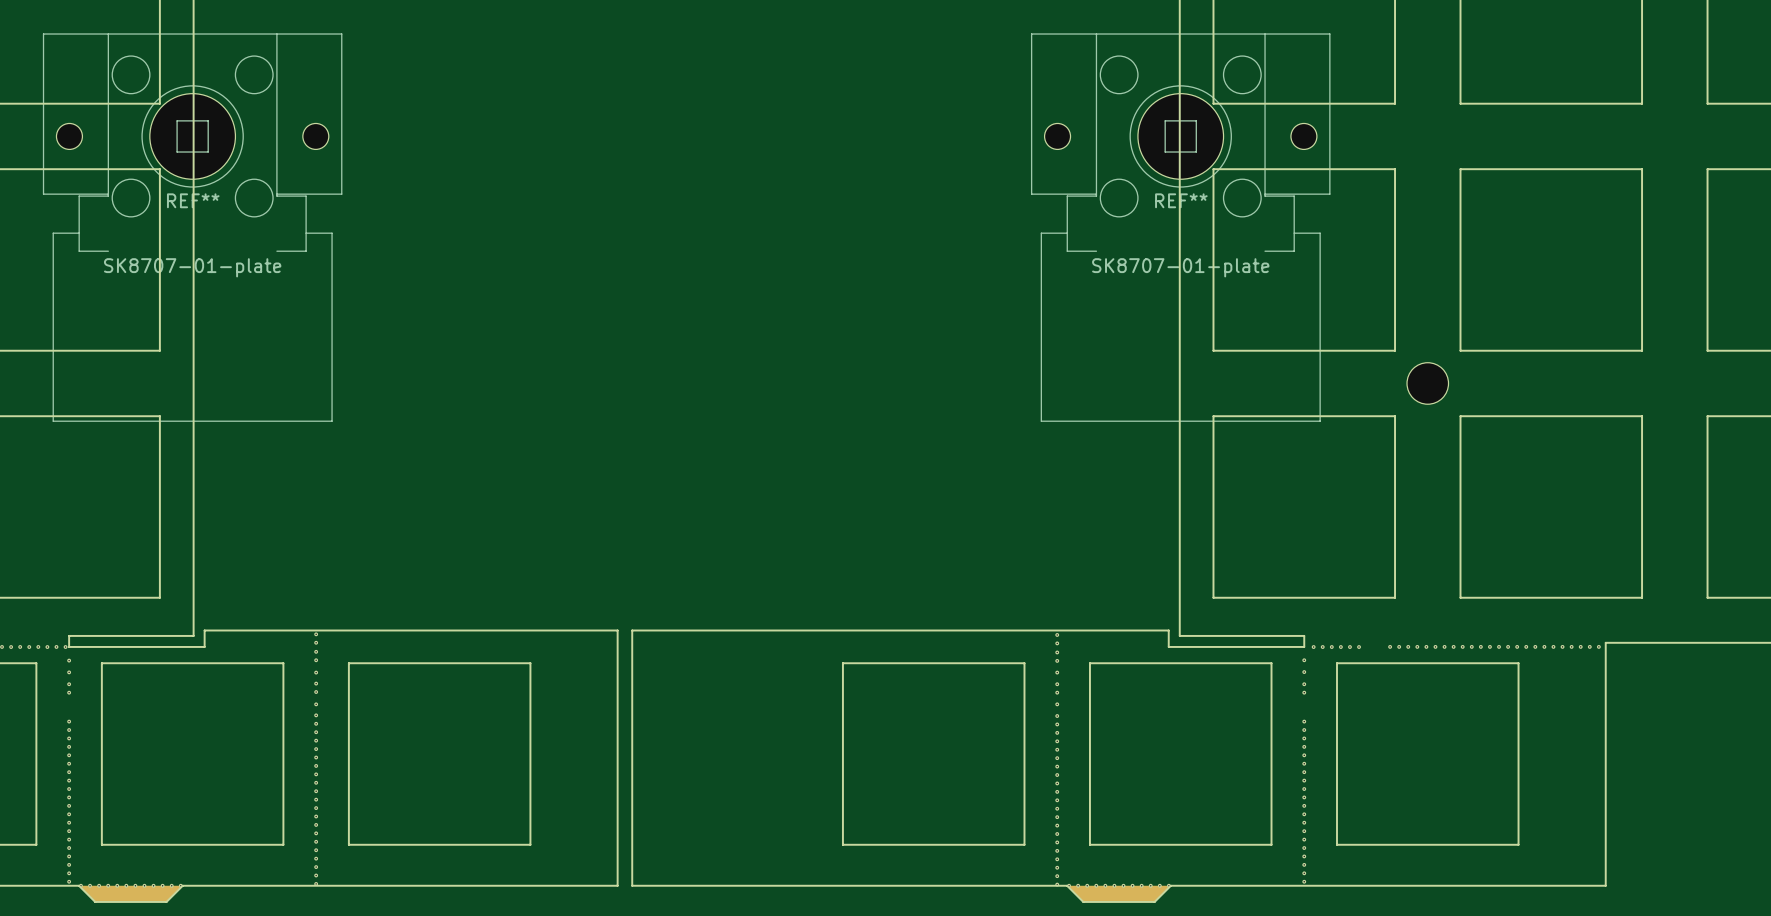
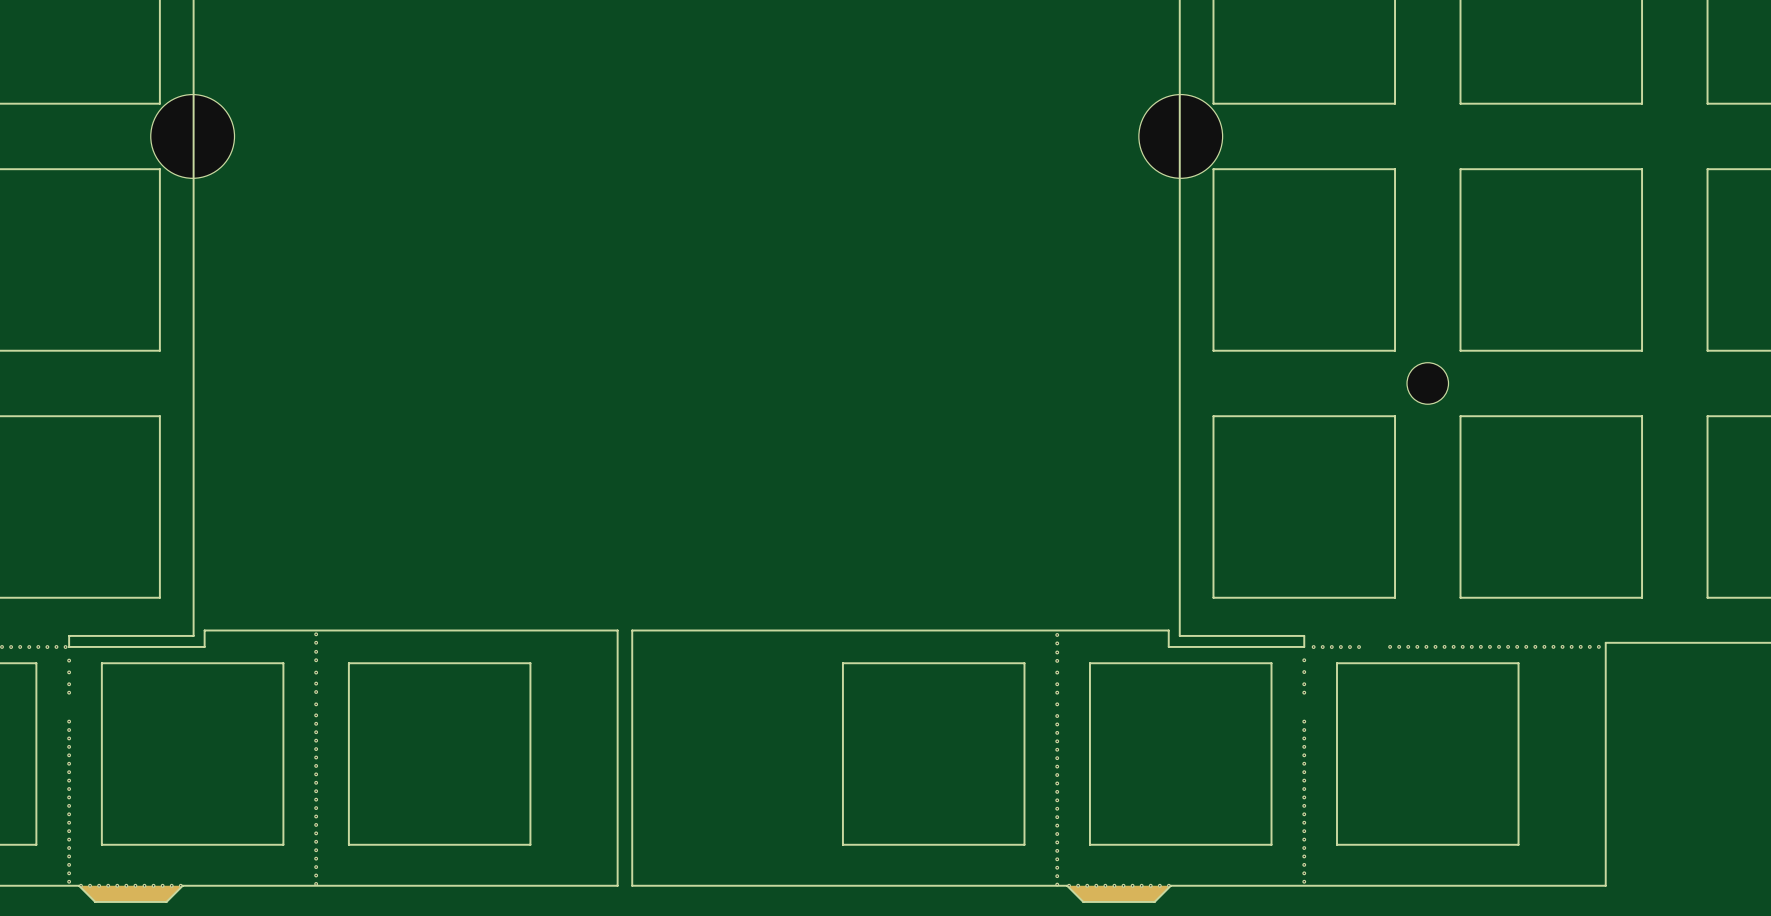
part: none -> (192, 136)
part: none -> (1180, 136)
REF**: SK8707-01-plate (192, 227) -> none
REF**: SK8707-01-plate (1180, 227) -> none

